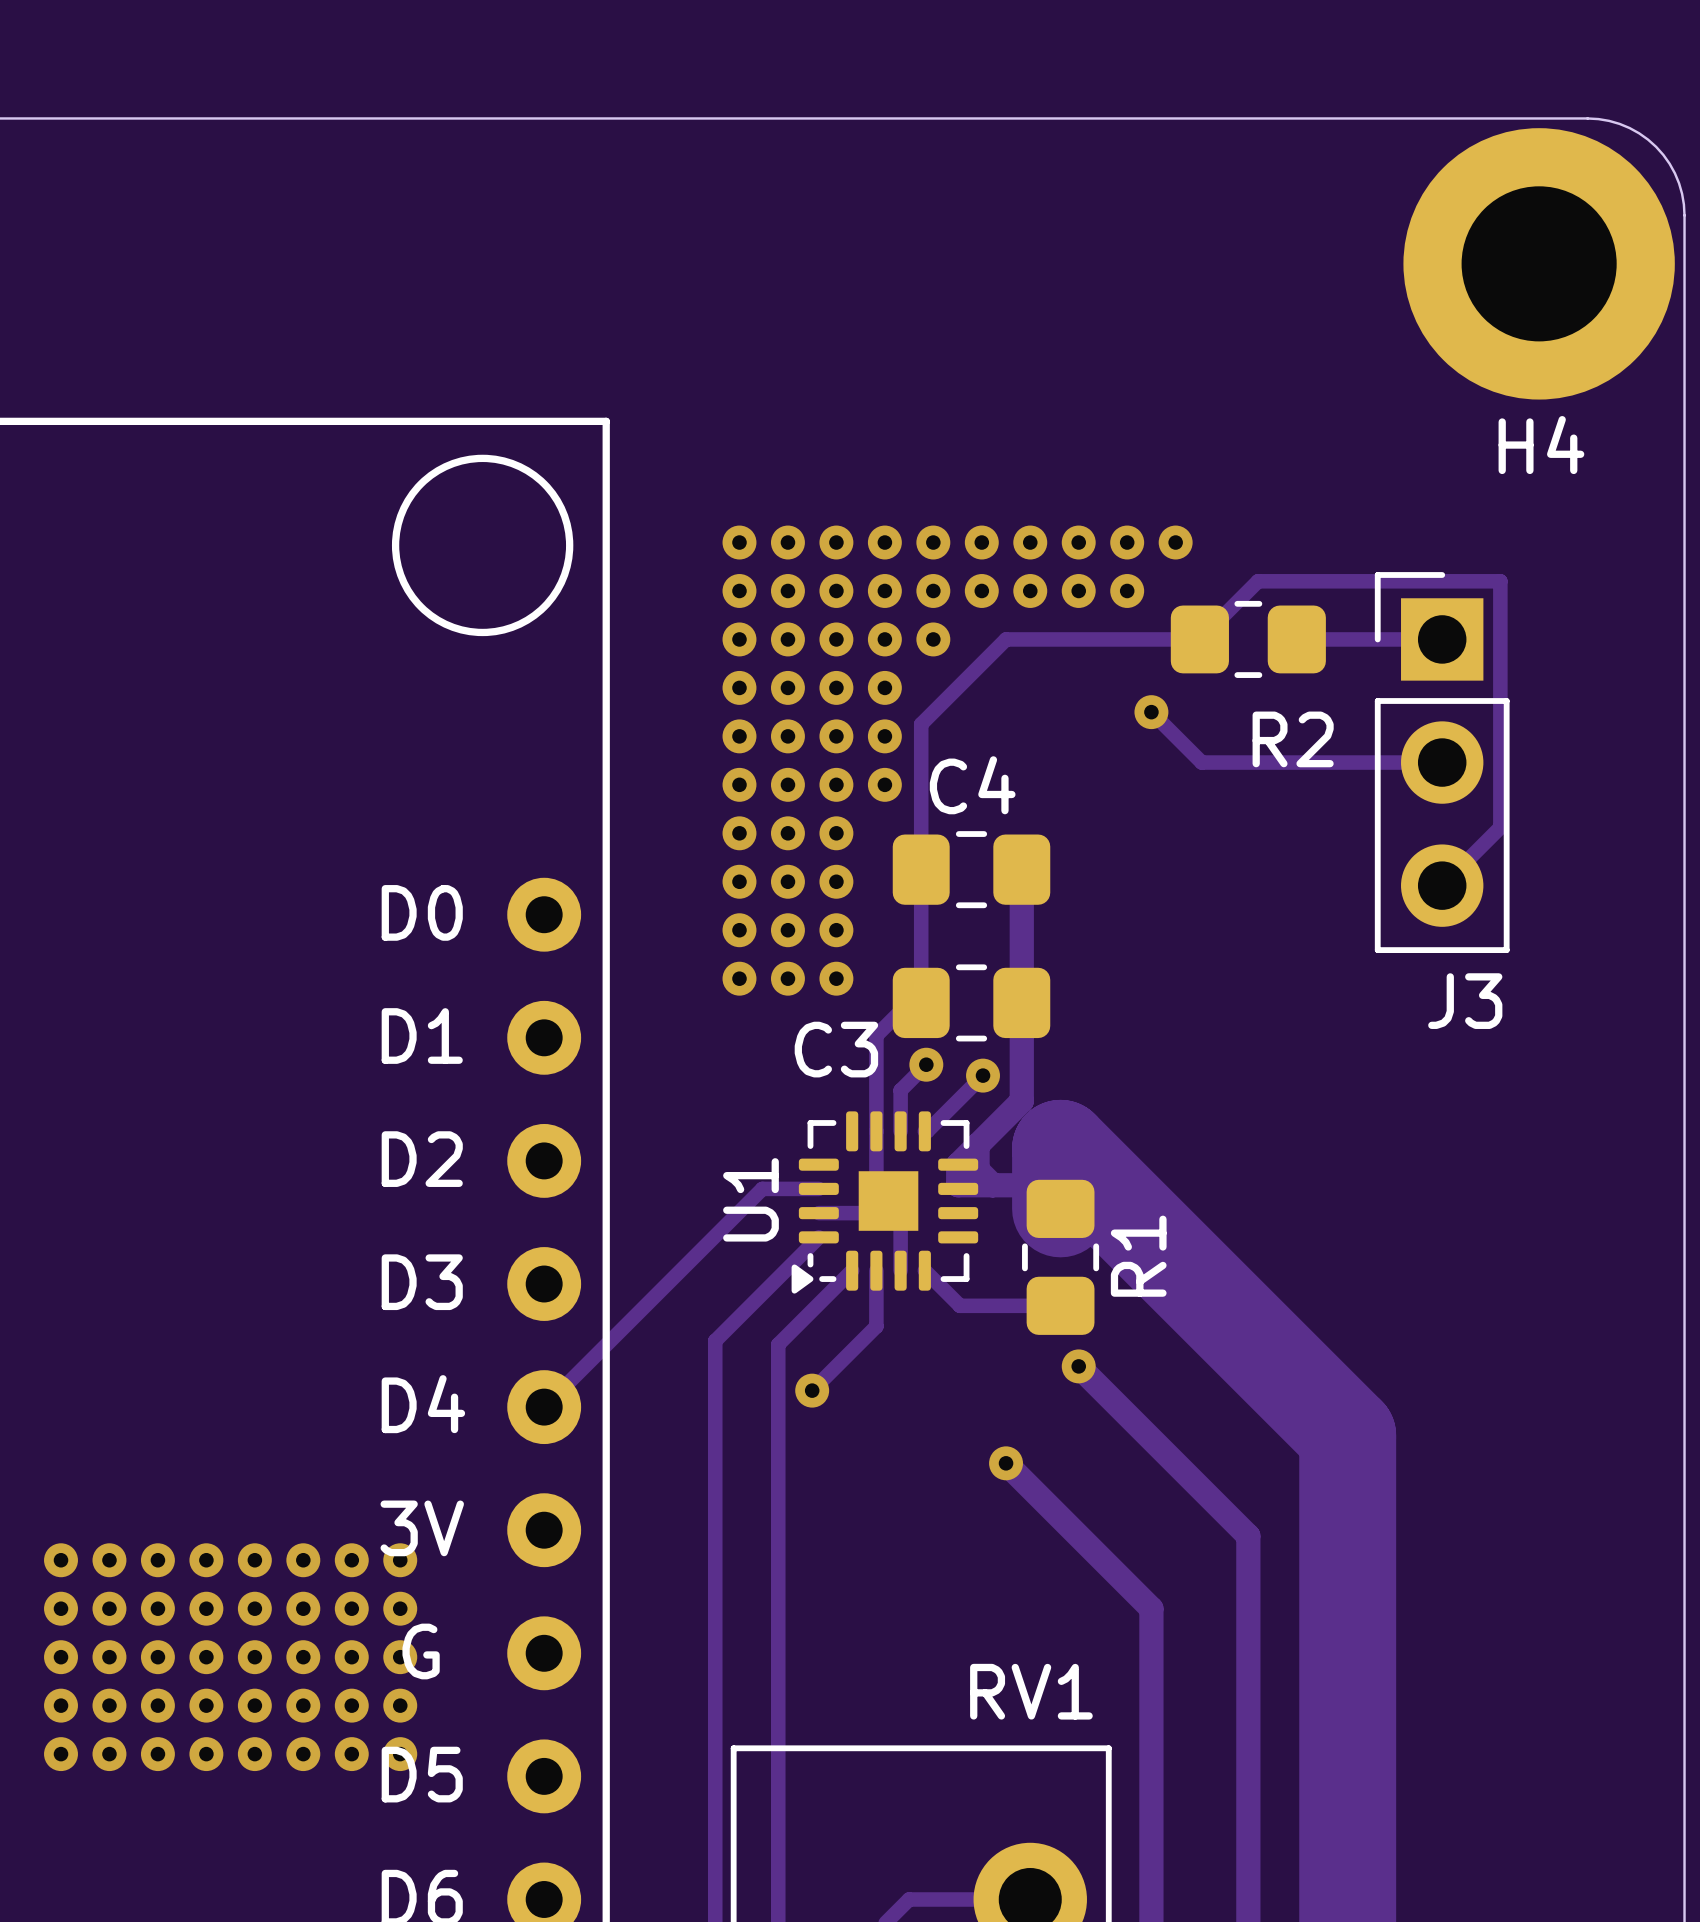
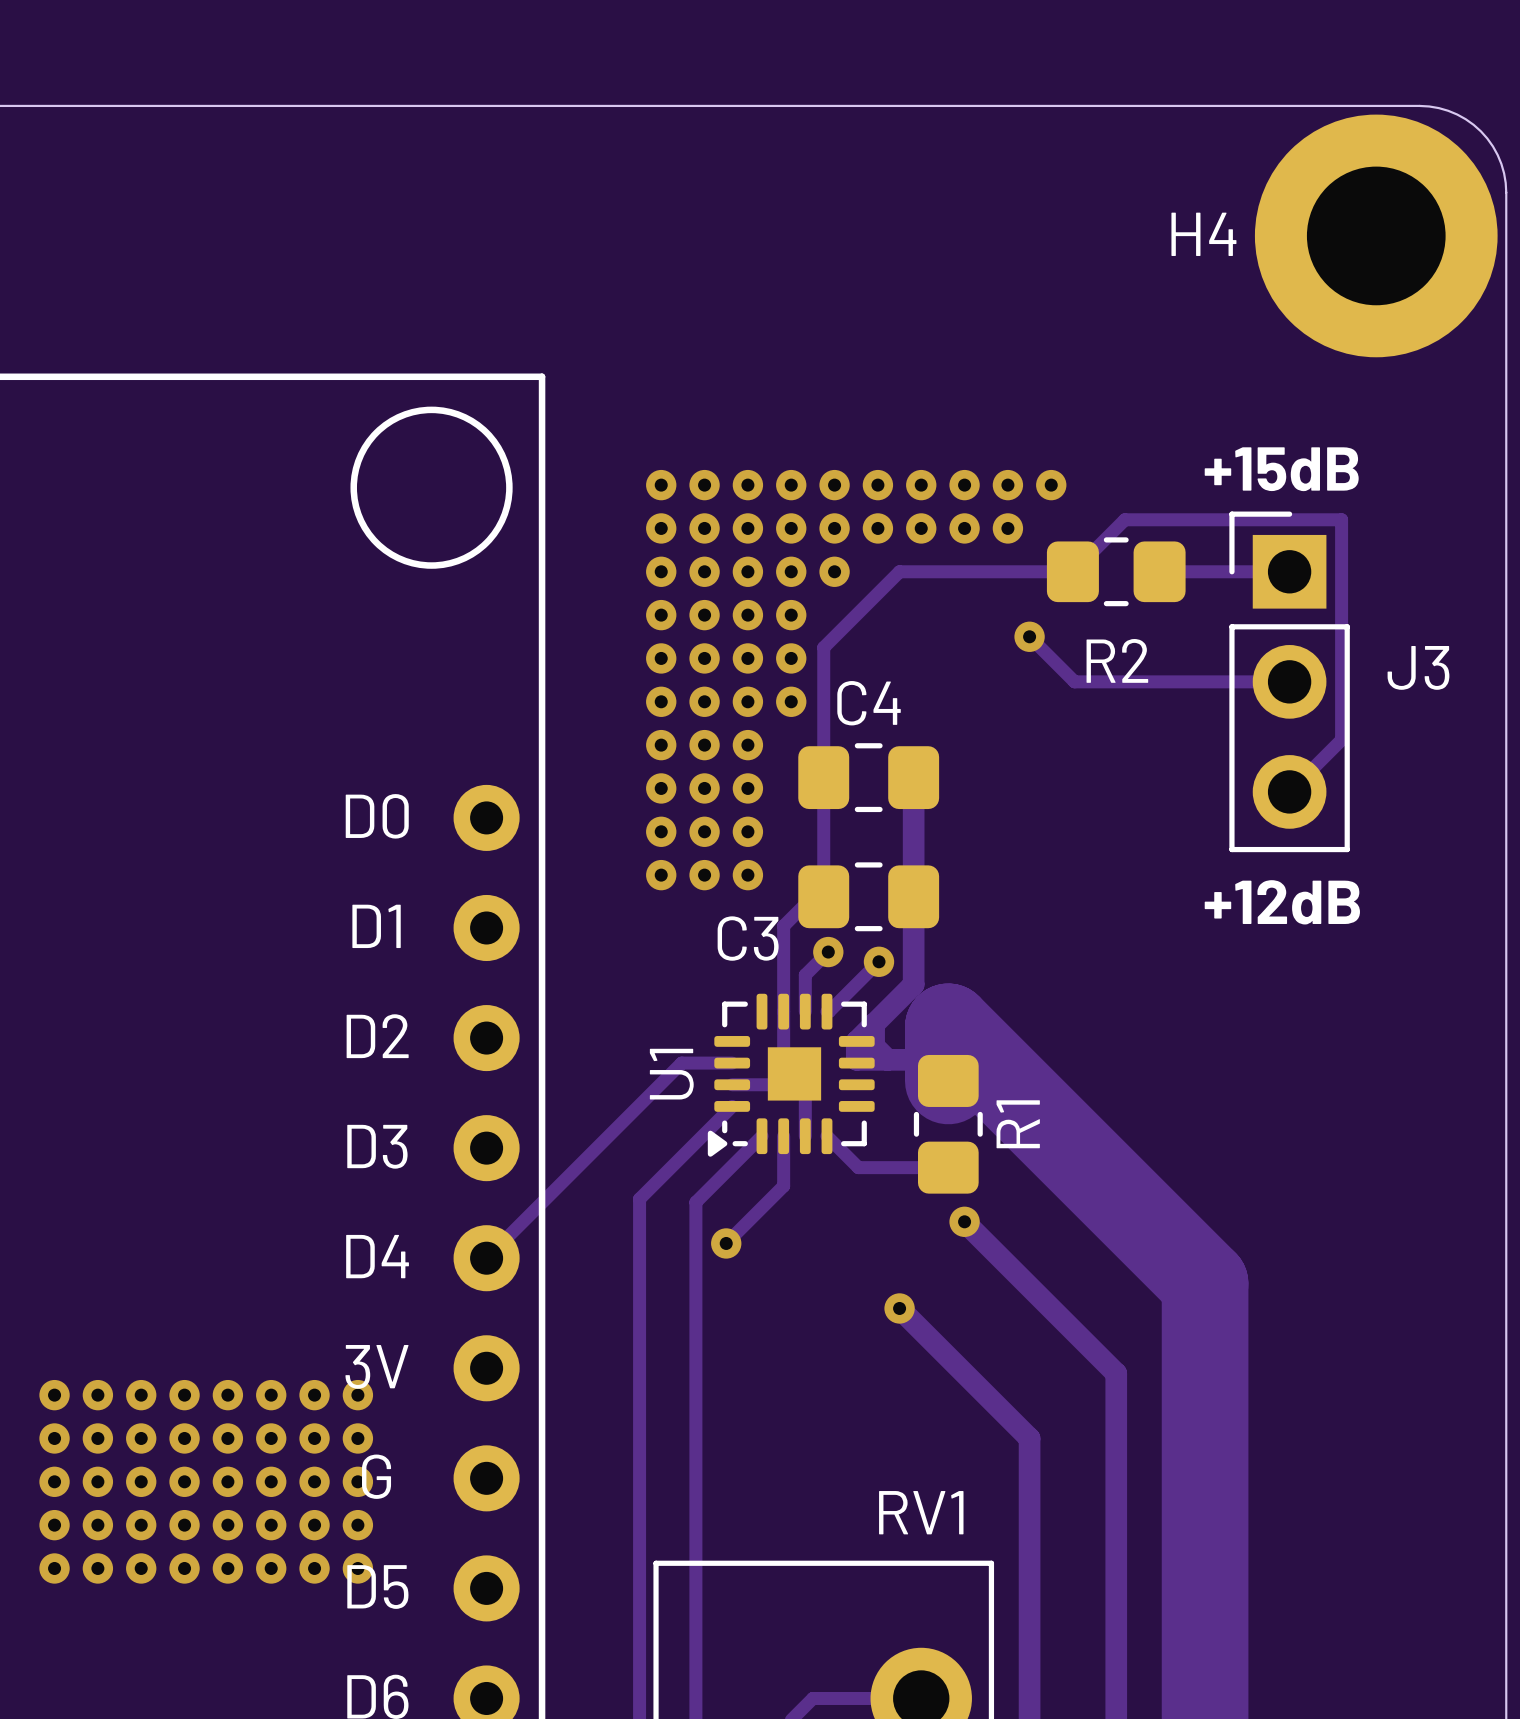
H4 name position: H4 (1541, 445) -> H4 (1203, 234)
text: none -> +15dB (1281, 469)
R2 name position: R2 (1293, 739) -> R2 (1117, 660)
J3 name position: J3 (1465, 1001) -> J3 (1418, 667)
text: none -> +12dB (1282, 902)

